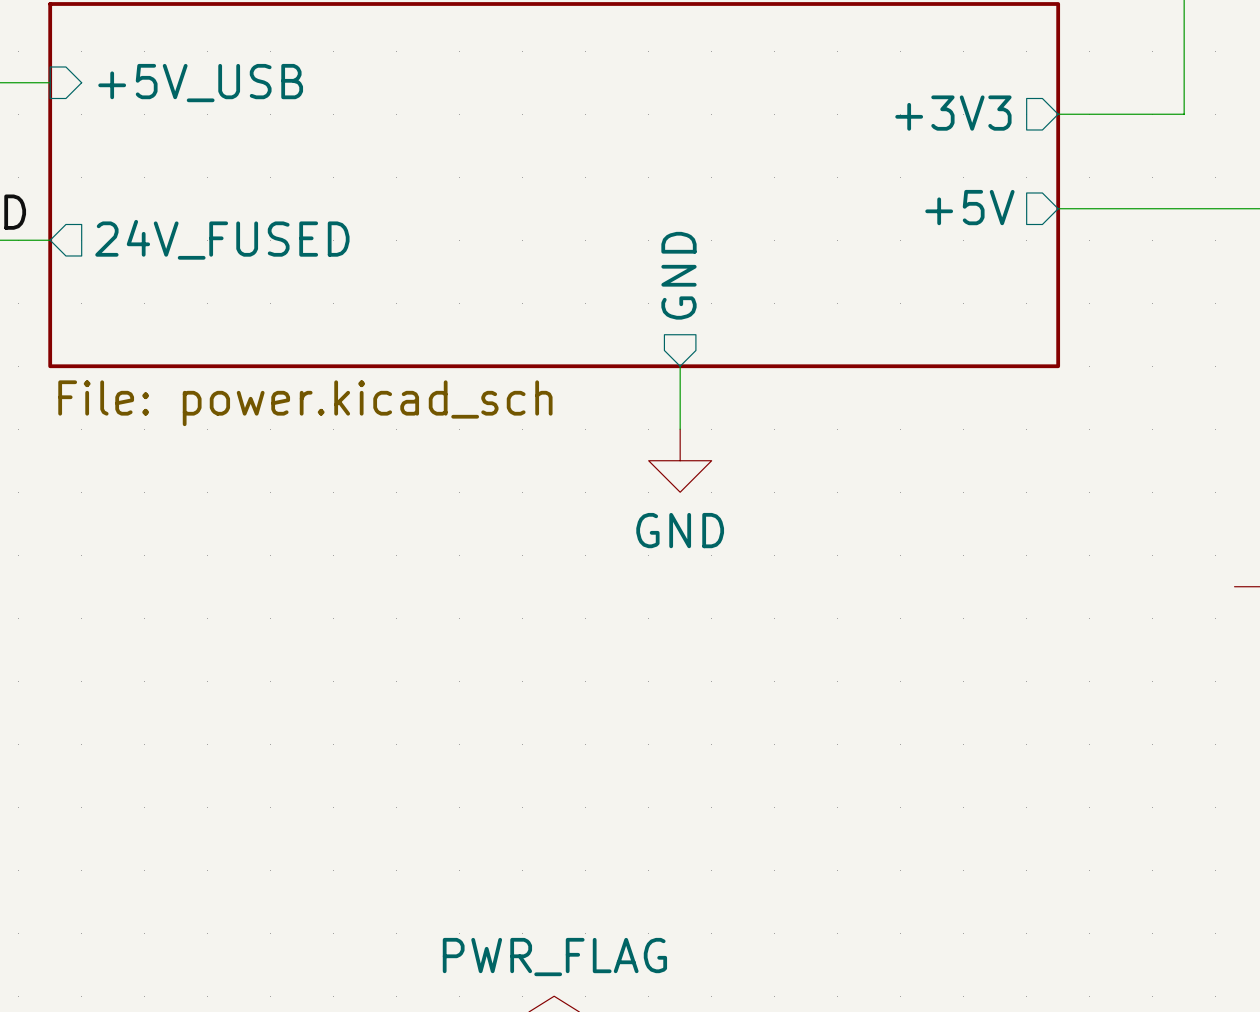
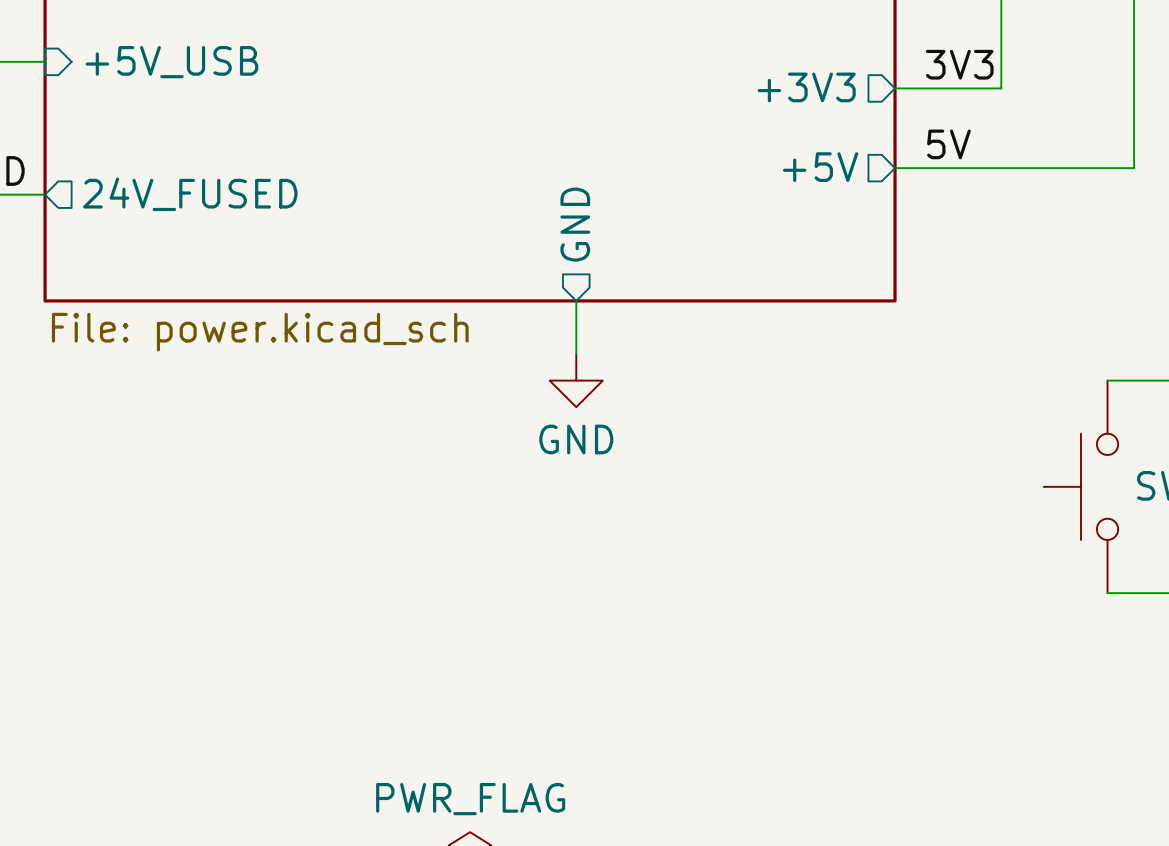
label: none -> 3V3 (959, 64)
label: none -> 5V (948, 144)

